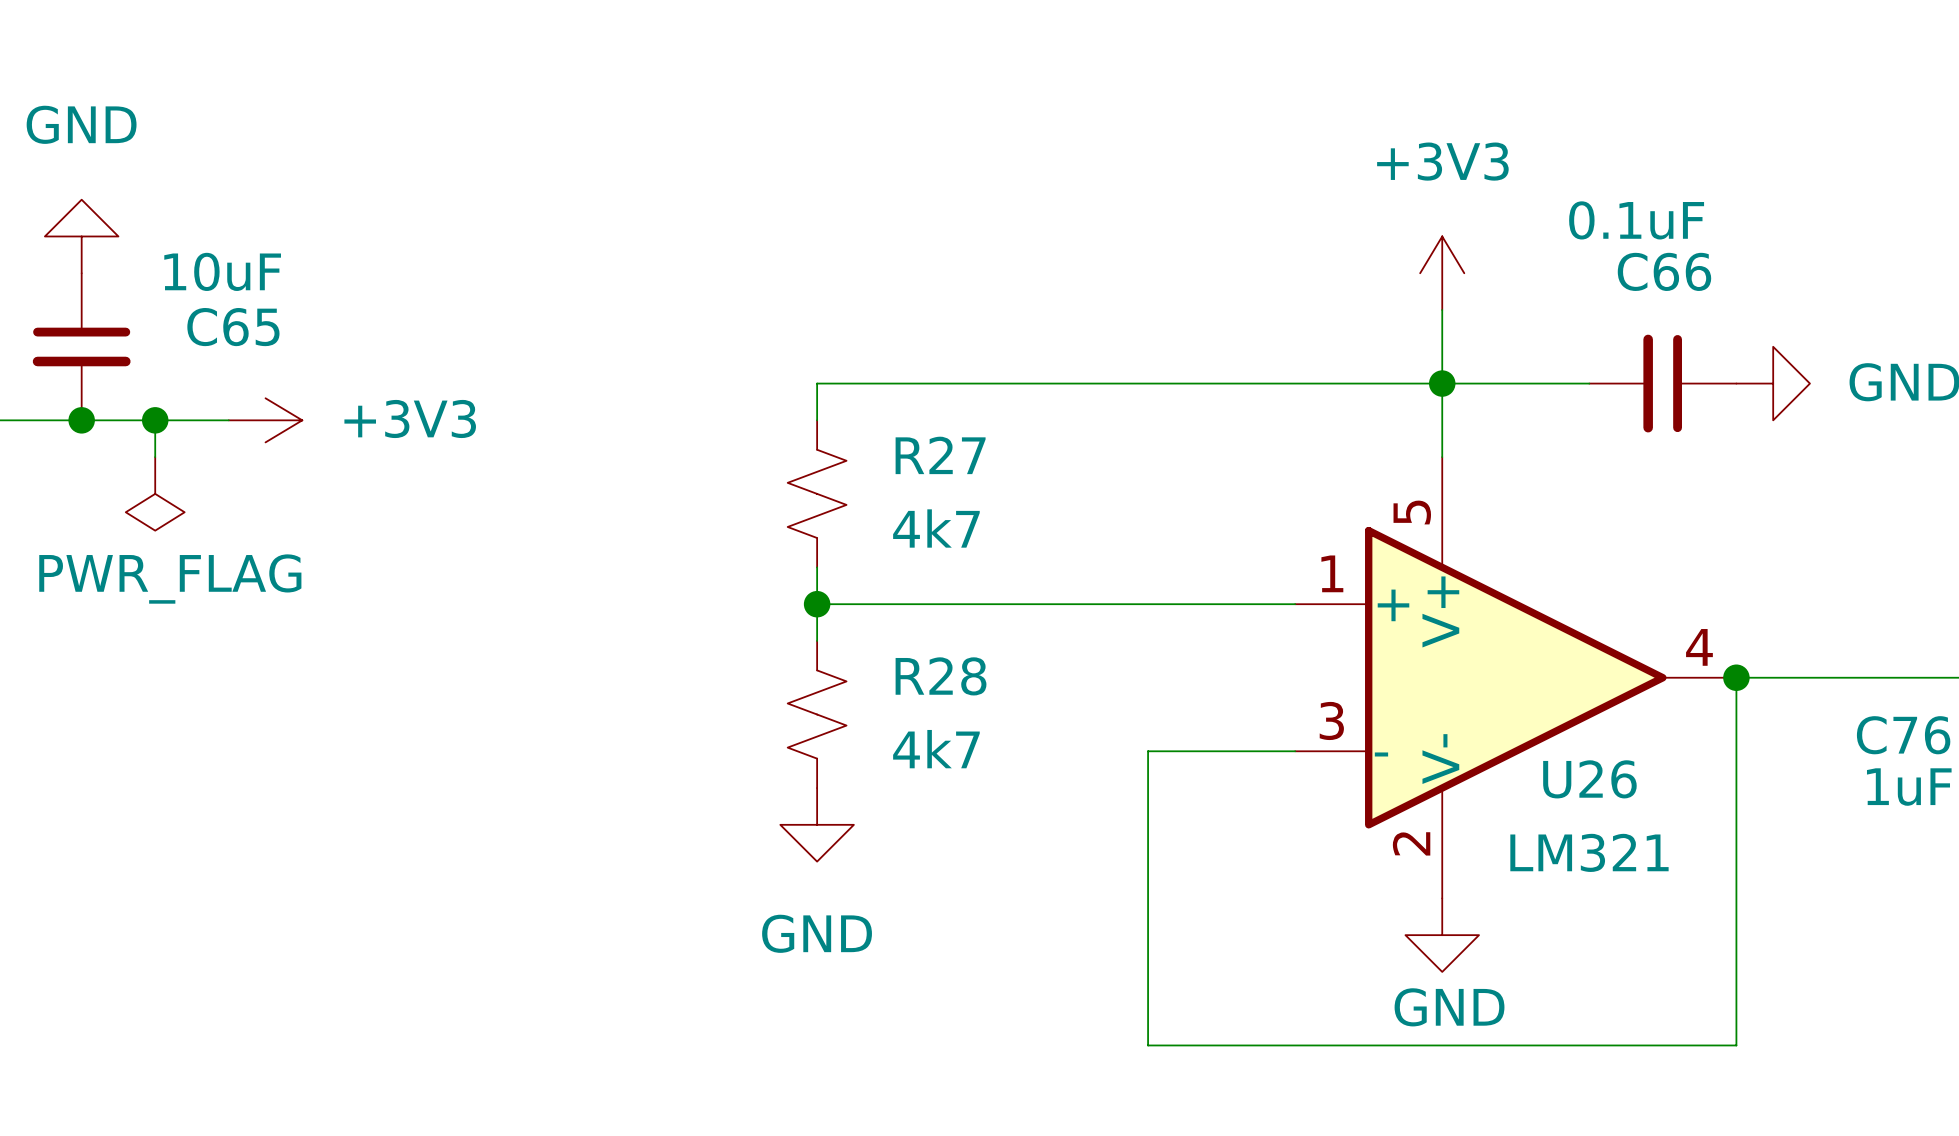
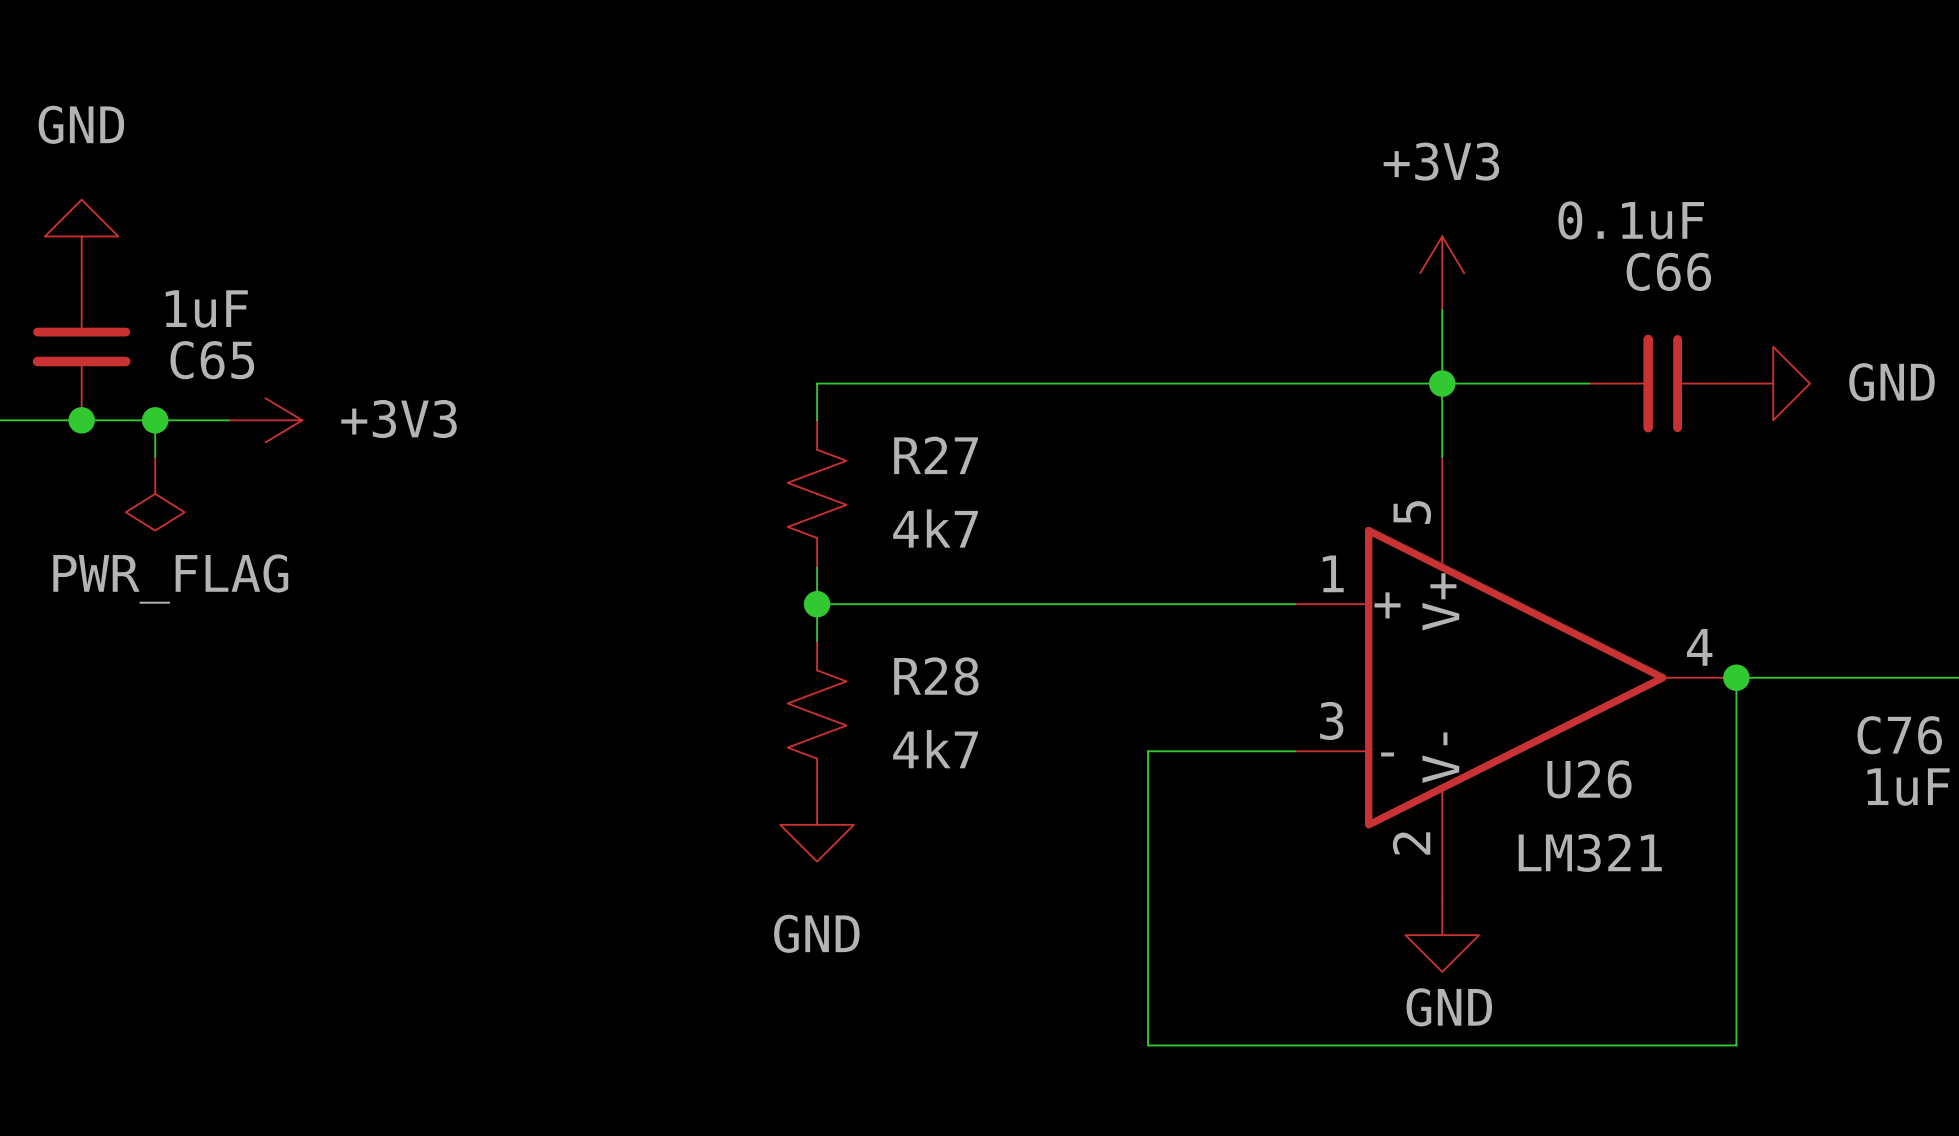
C65 value: 10uF (222, 271) -> 1uF (206, 309)
C65 name position: C65 (233, 327) -> C65 (212, 360)

